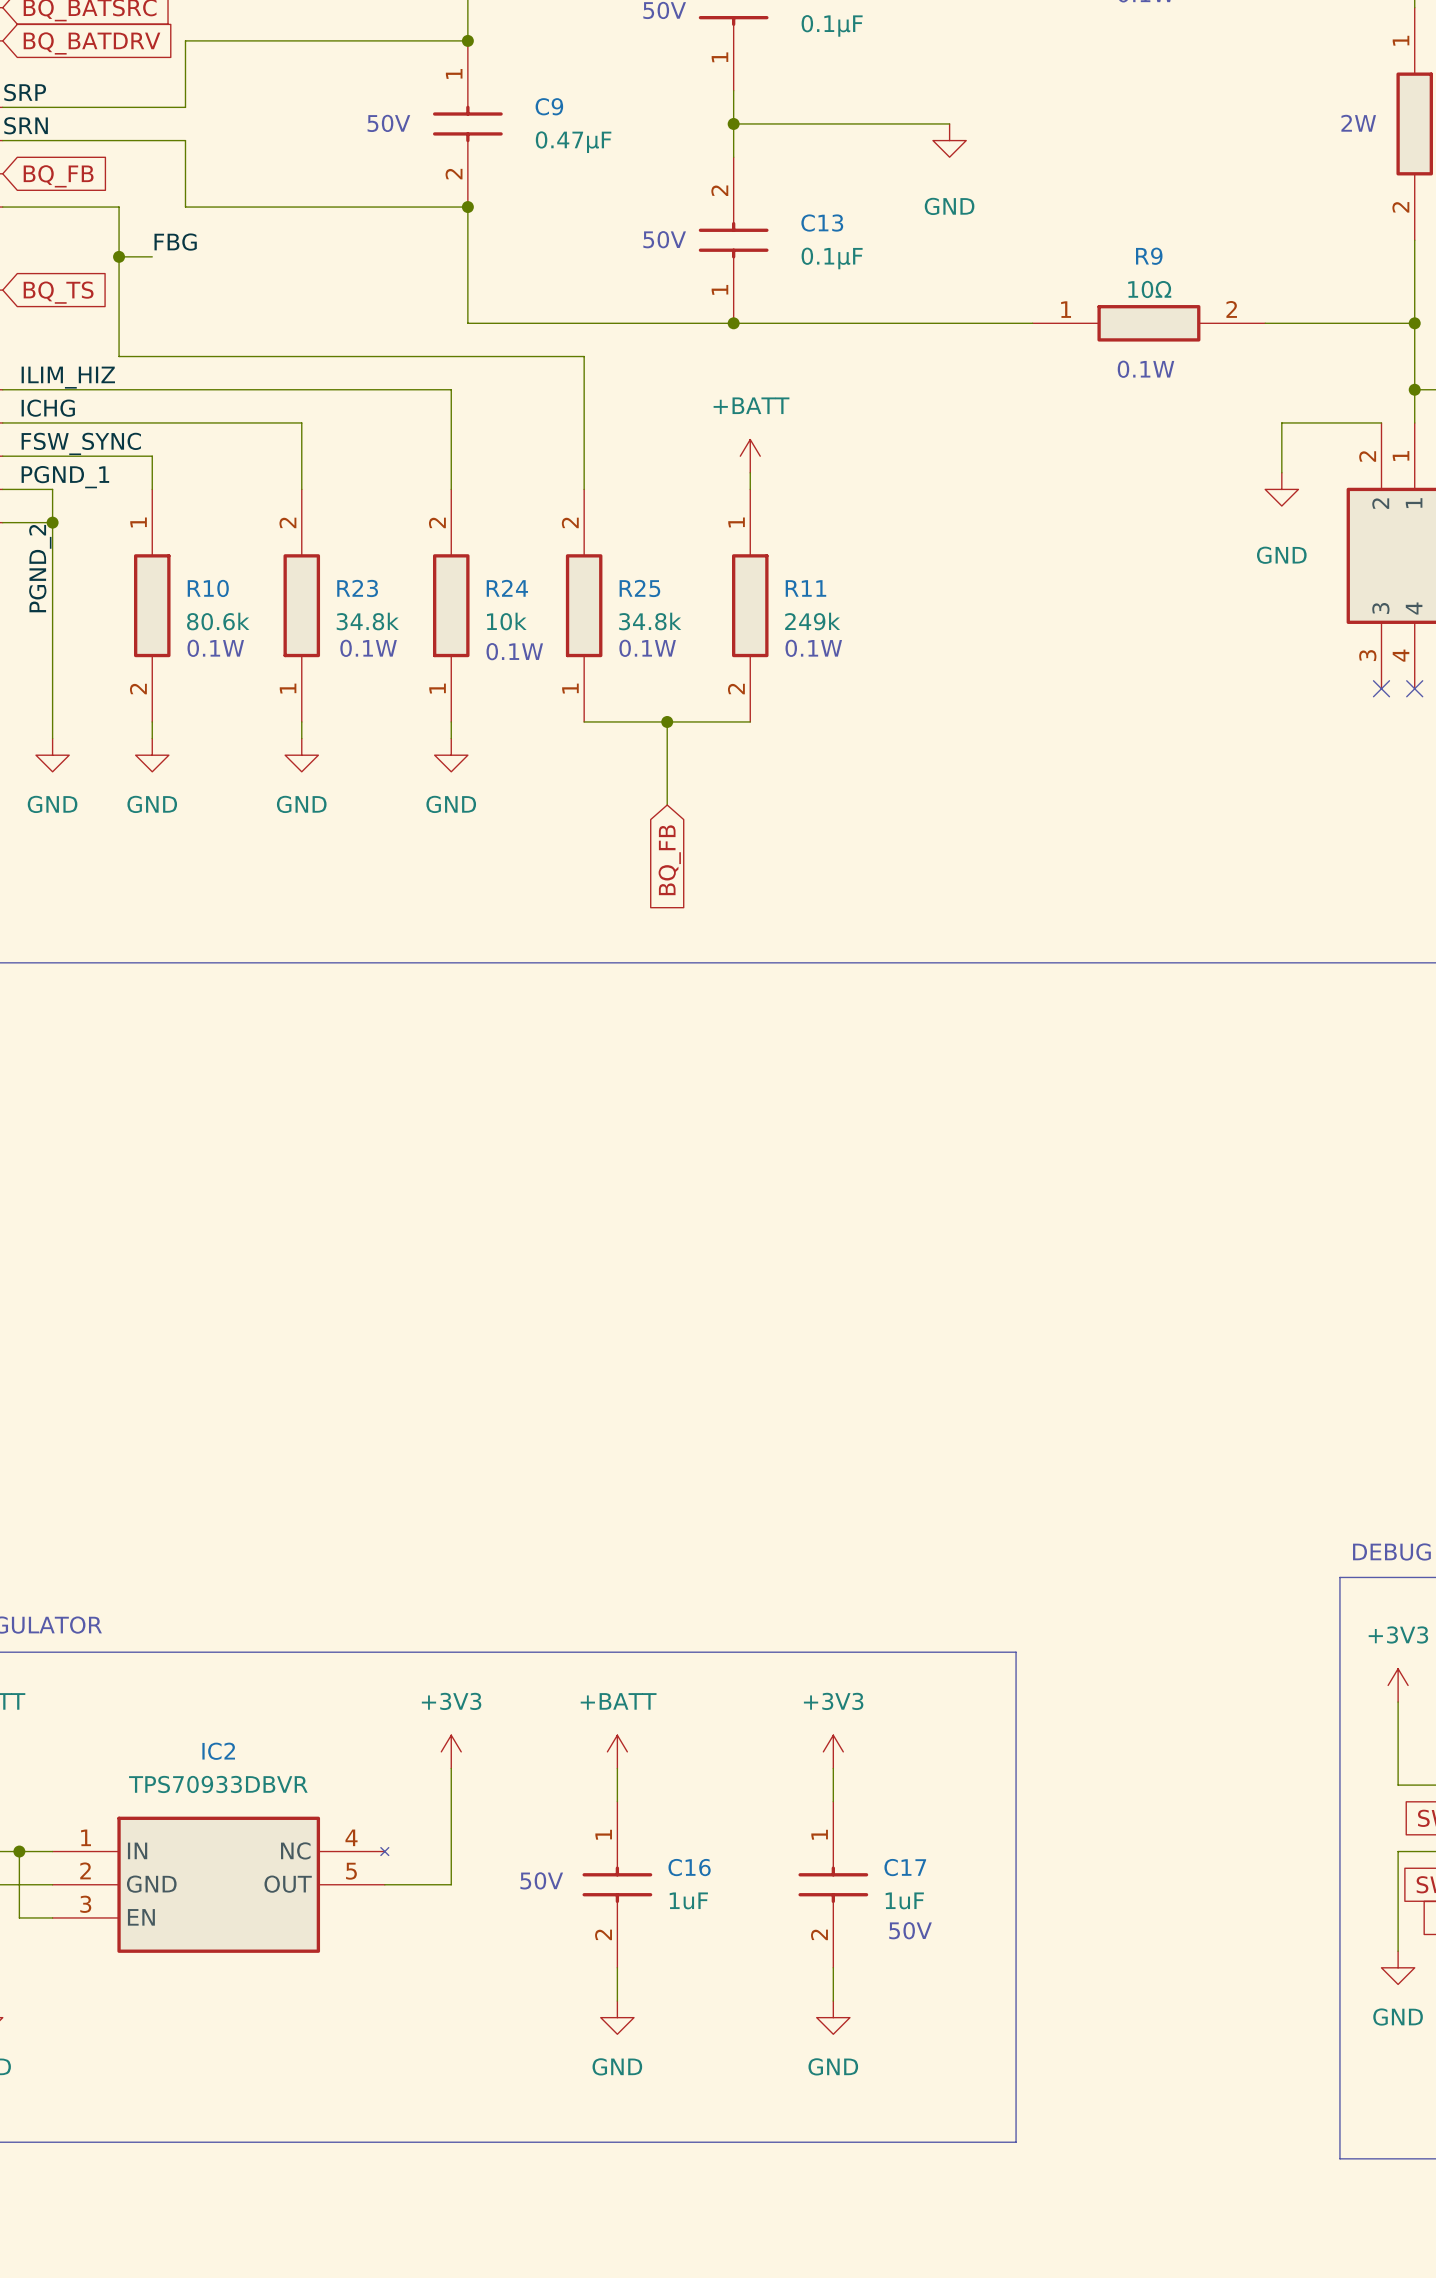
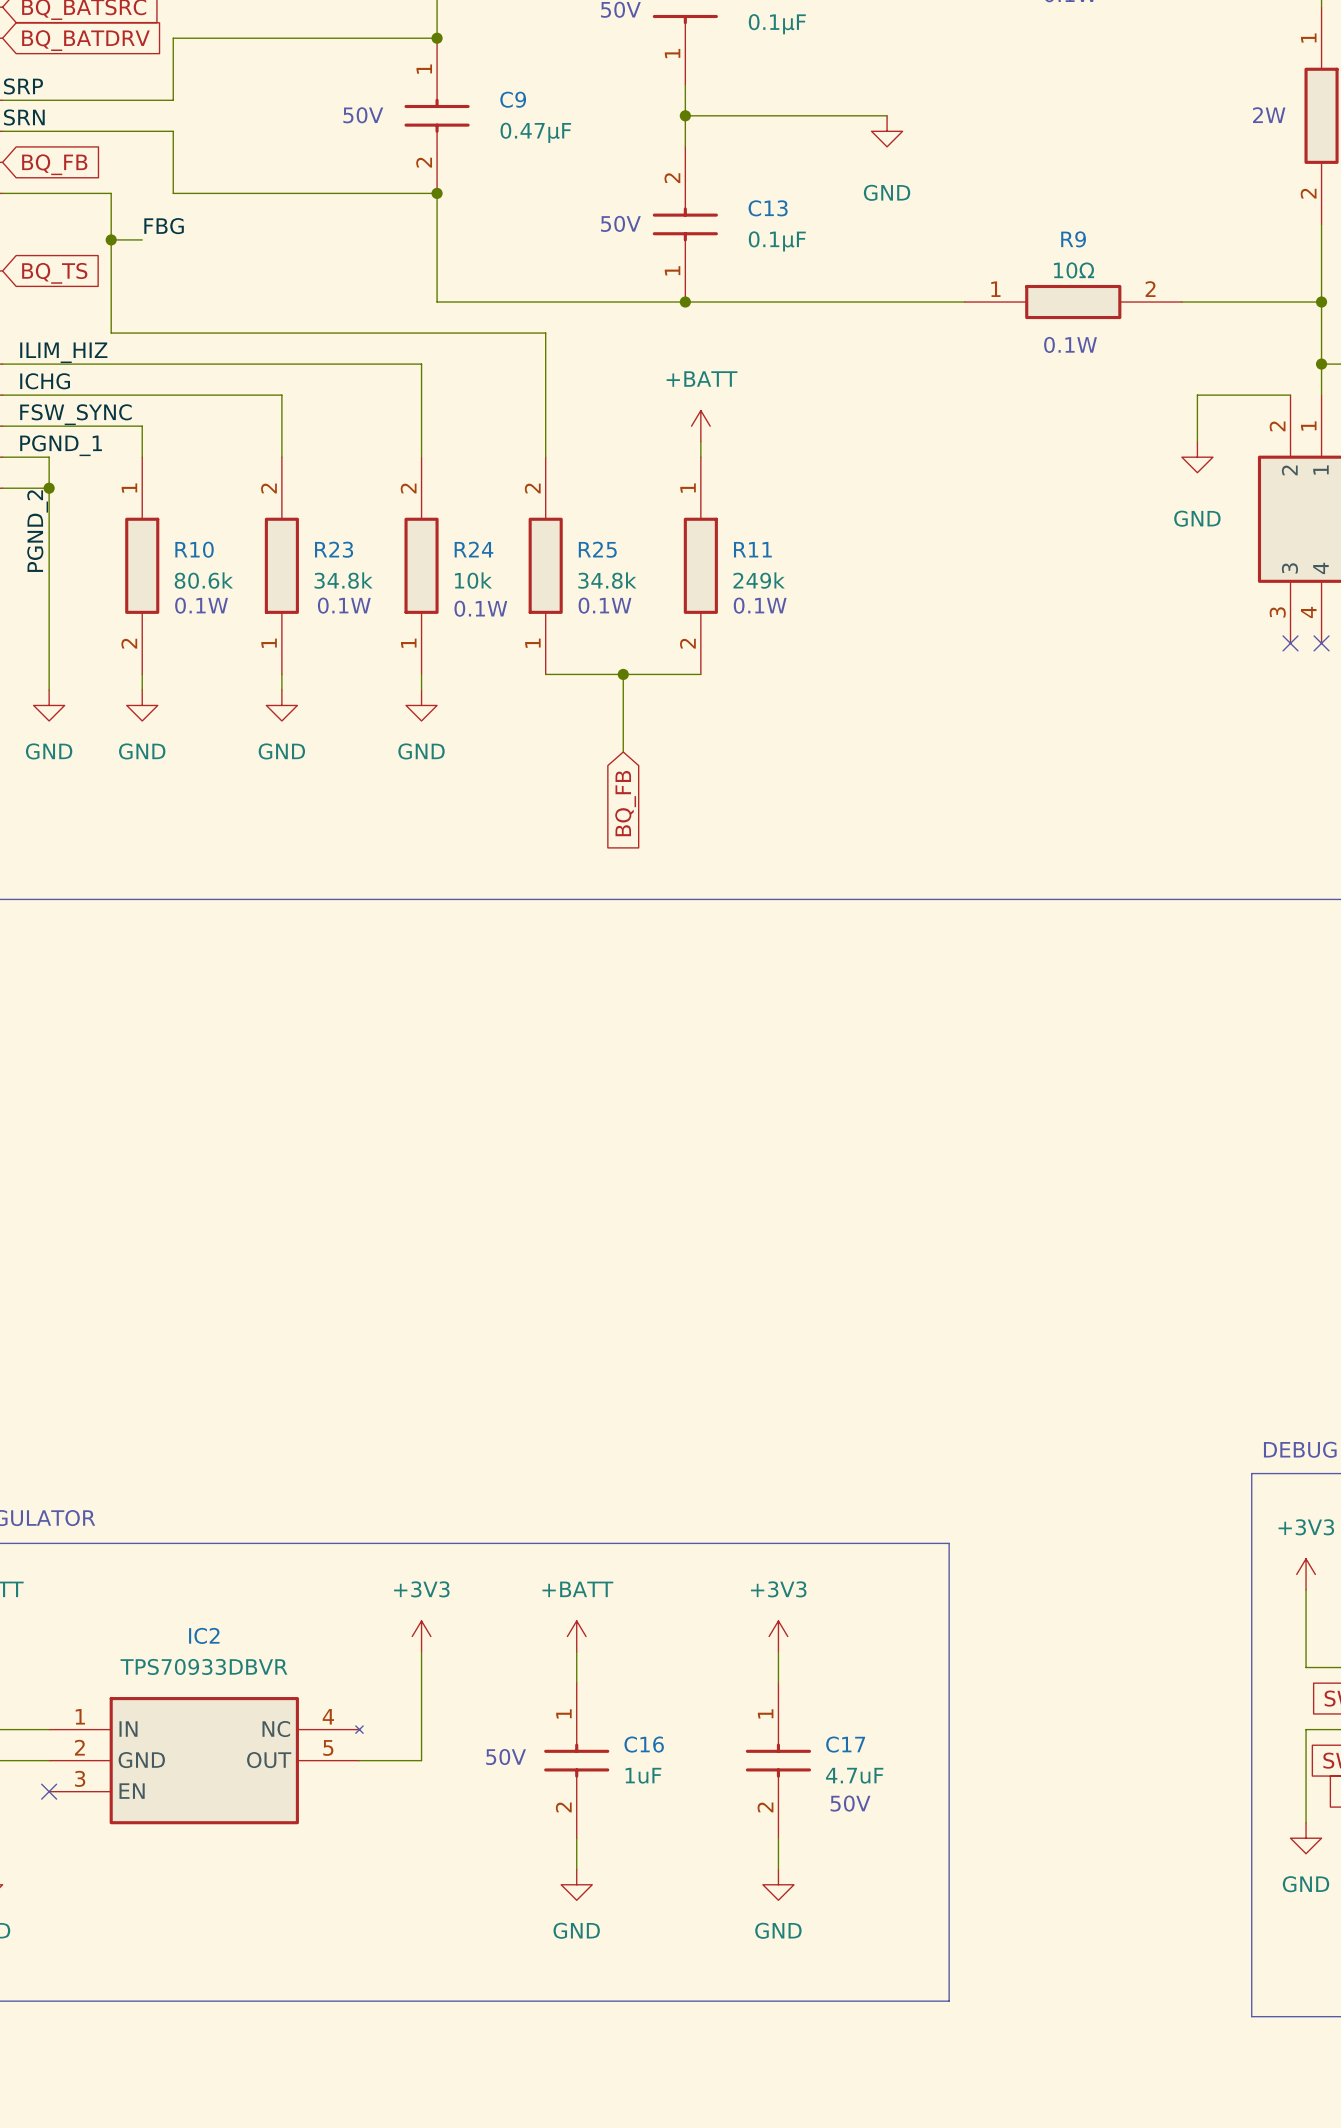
wire: (19, 1851) (19, 1917) (52, 1917) -> none
junction: (19, 1851) -> none
C17 value: 1uF (904, 1900) -> 4.7uF (854, 1775)
no-connect mark: none -> (49, 1791)

